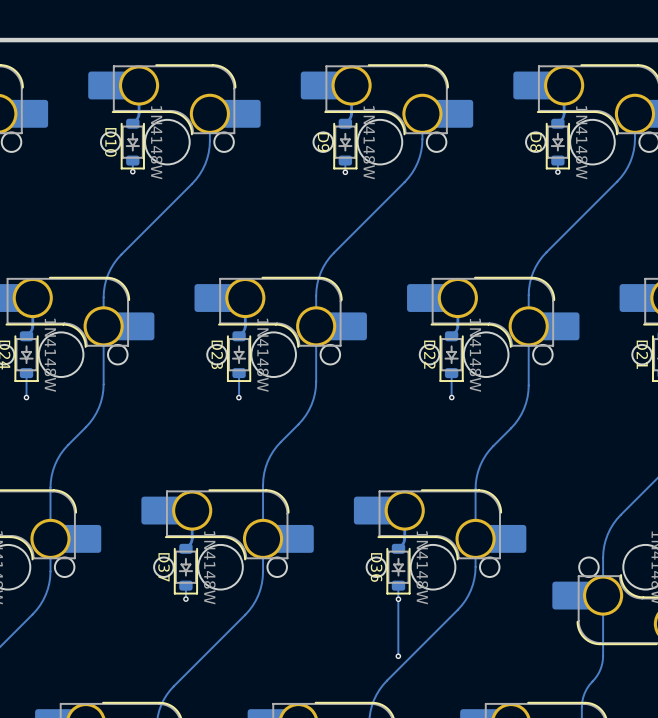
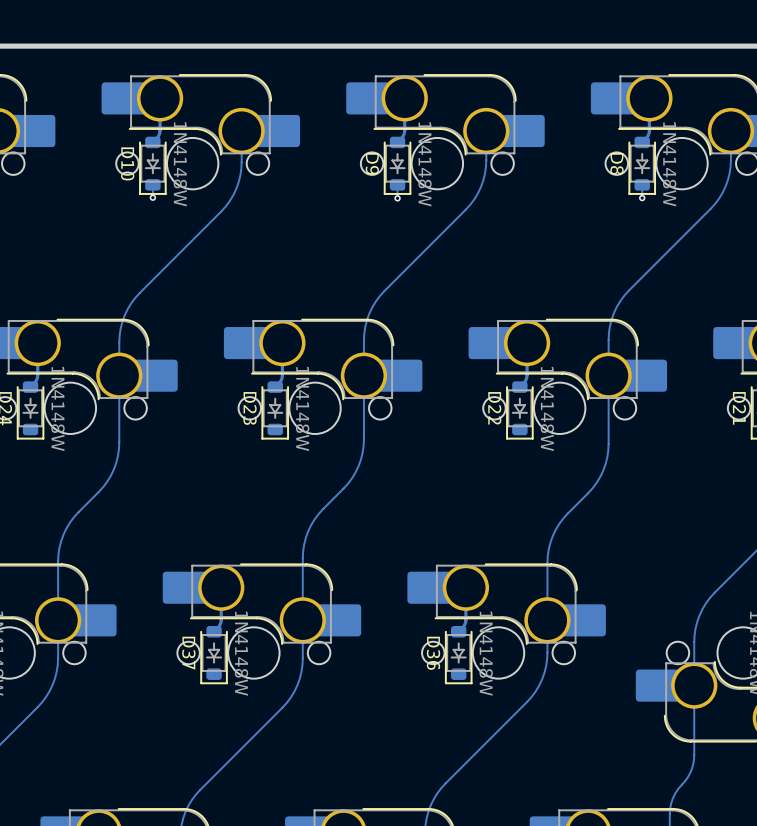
track: (26, 373) (26, 397) -> none
track: (239, 373) (238, 397) -> none
track: (451, 373) (451, 397) -> none
via: (26, 397) -> none
via: (238, 397) -> none
via: (451, 397) -> none
track: (185, 585) (185, 599) -> none
track: (398, 585) (398, 656) -> none
via: (185, 599) -> none
via: (398, 599) -> none
via: (398, 656) -> none

